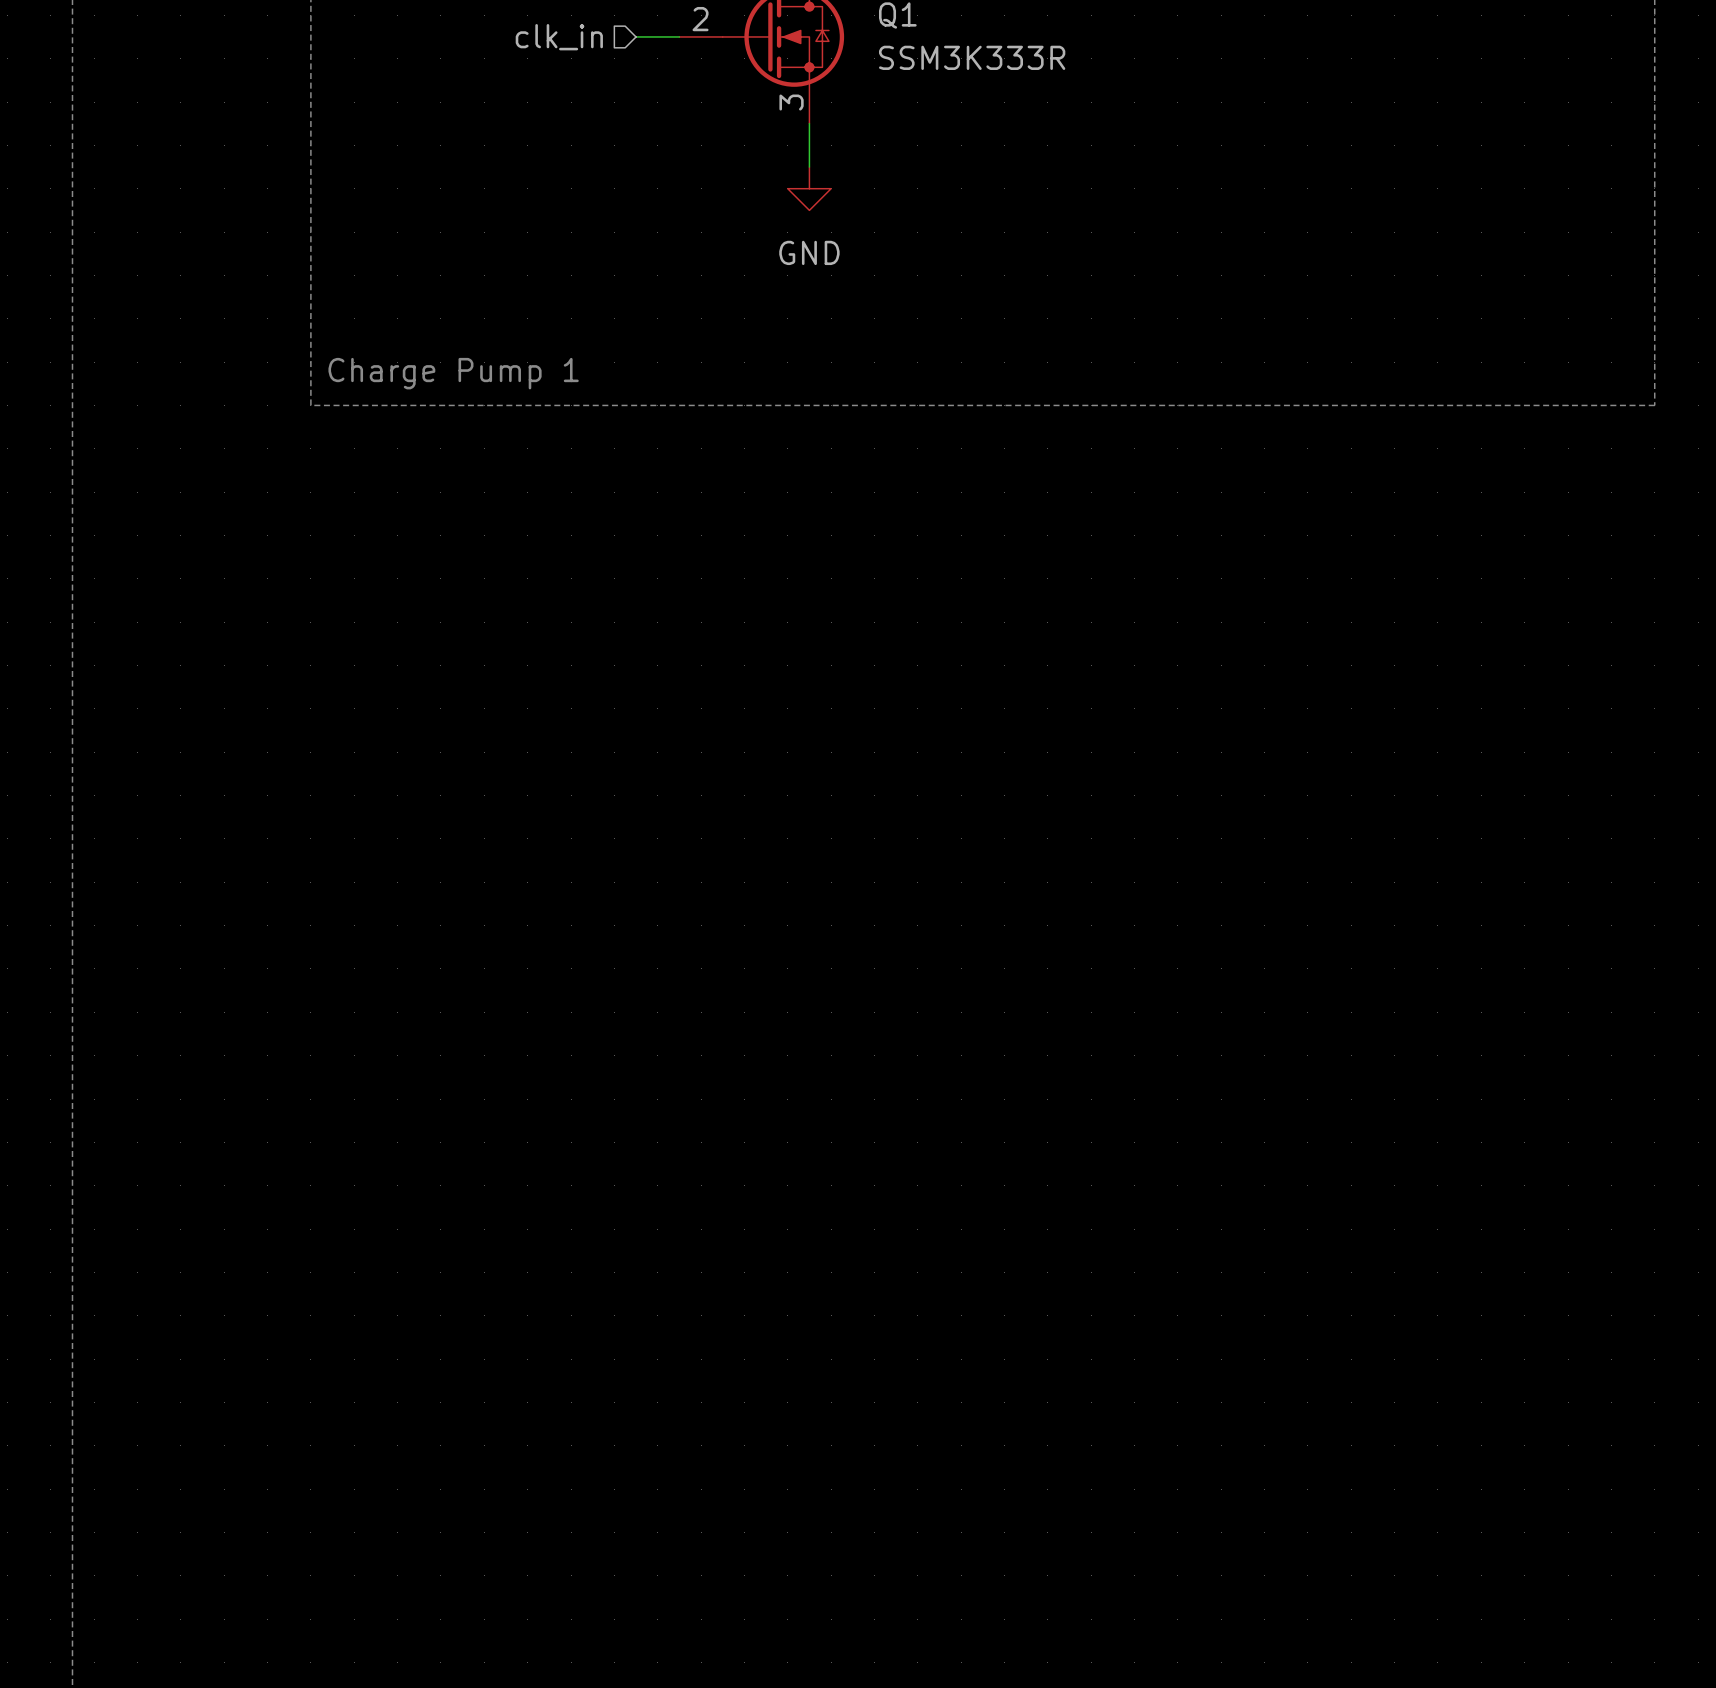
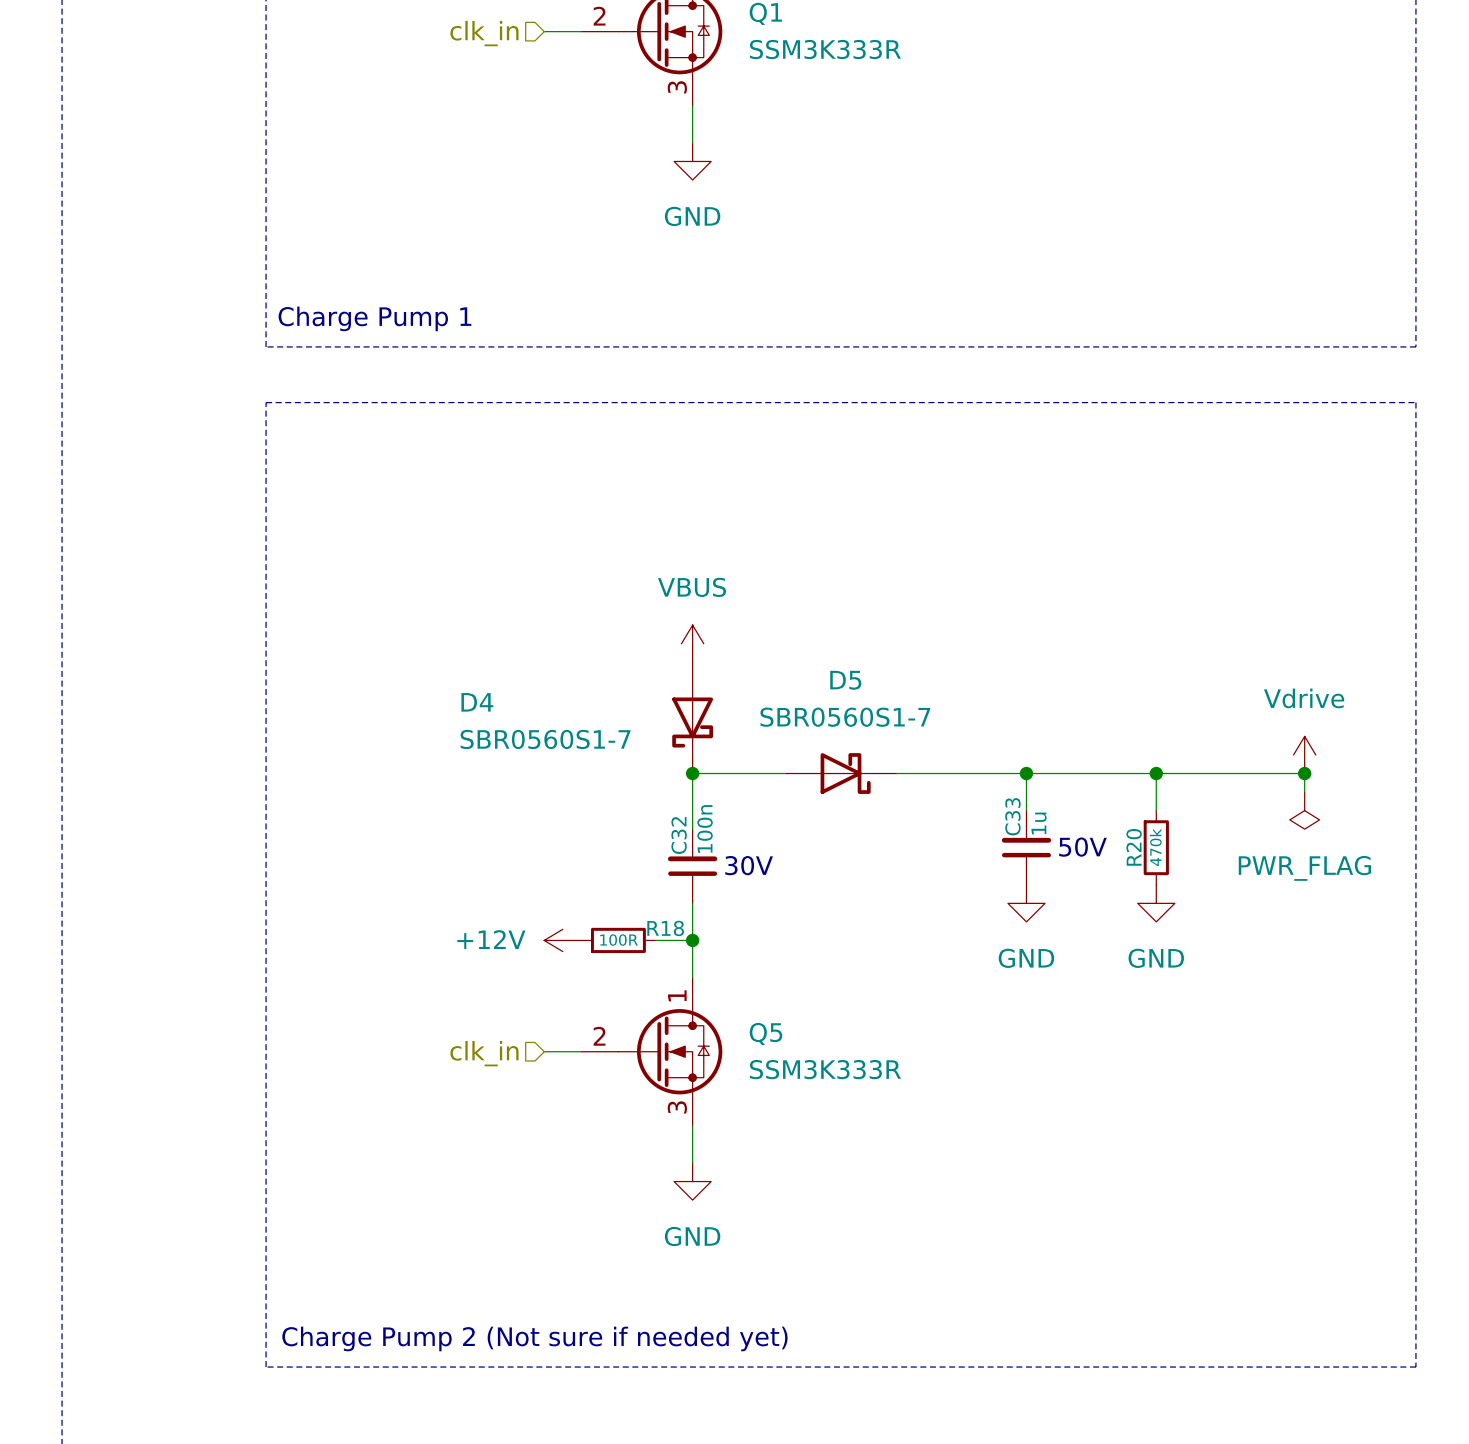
line: none -> (266, 402) (1415, 402) (1415, 1367) (266, 1367) (266, 402)
power symbol: none -> VBUS (692, 643)
D4: none -> SBR0560S1-7 (692, 717)
power symbol: none -> Vdrive (1304, 754)
junction: none -> (692, 773)
wire: none -> (785, 773) (692, 773) (692, 829)
D5: none -> SBR0560S1-7 (841, 773)
wire: none -> (896, 773) (1304, 773) (1304, 792)
wire: none -> (1026, 773) (1026, 810)
junction: none -> (1026, 773)
wire: none -> (1156, 773) (1156, 810)
junction: none -> (1156, 773)
junction: none -> (1304, 773)
power symbol: none -> PWR_FLAG (1304, 810)
text: none -> 50V (1082, 847)
C33: none -> 1u (1026, 847)
R20: none -> 470k (1156, 847)
text: none -> 30V (749, 865)
C32: none -> 100n (692, 866)
wire: none -> (692, 903) (692, 977)
power symbol: none -> GND (1026, 903)
power symbol: none -> GND (1156, 903)
power symbol: none -> +12V (562, 940)
R18: none -> 100R (618, 940)
wire: none -> (655, 940) (692, 940)
junction: none -> (692, 940)
hierarchical label: none -> clk_in (484, 1053)
wire: none -> (544, 1051) (581, 1051)
Q5: none -> SSM3K333R (651, 1051)
wire: none -> (692, 1125) (692, 1163)
power symbol: none -> GND (692, 1181)
text: none -> Charge Pump 2 (Not sure if needed yet) (534, 1338)

